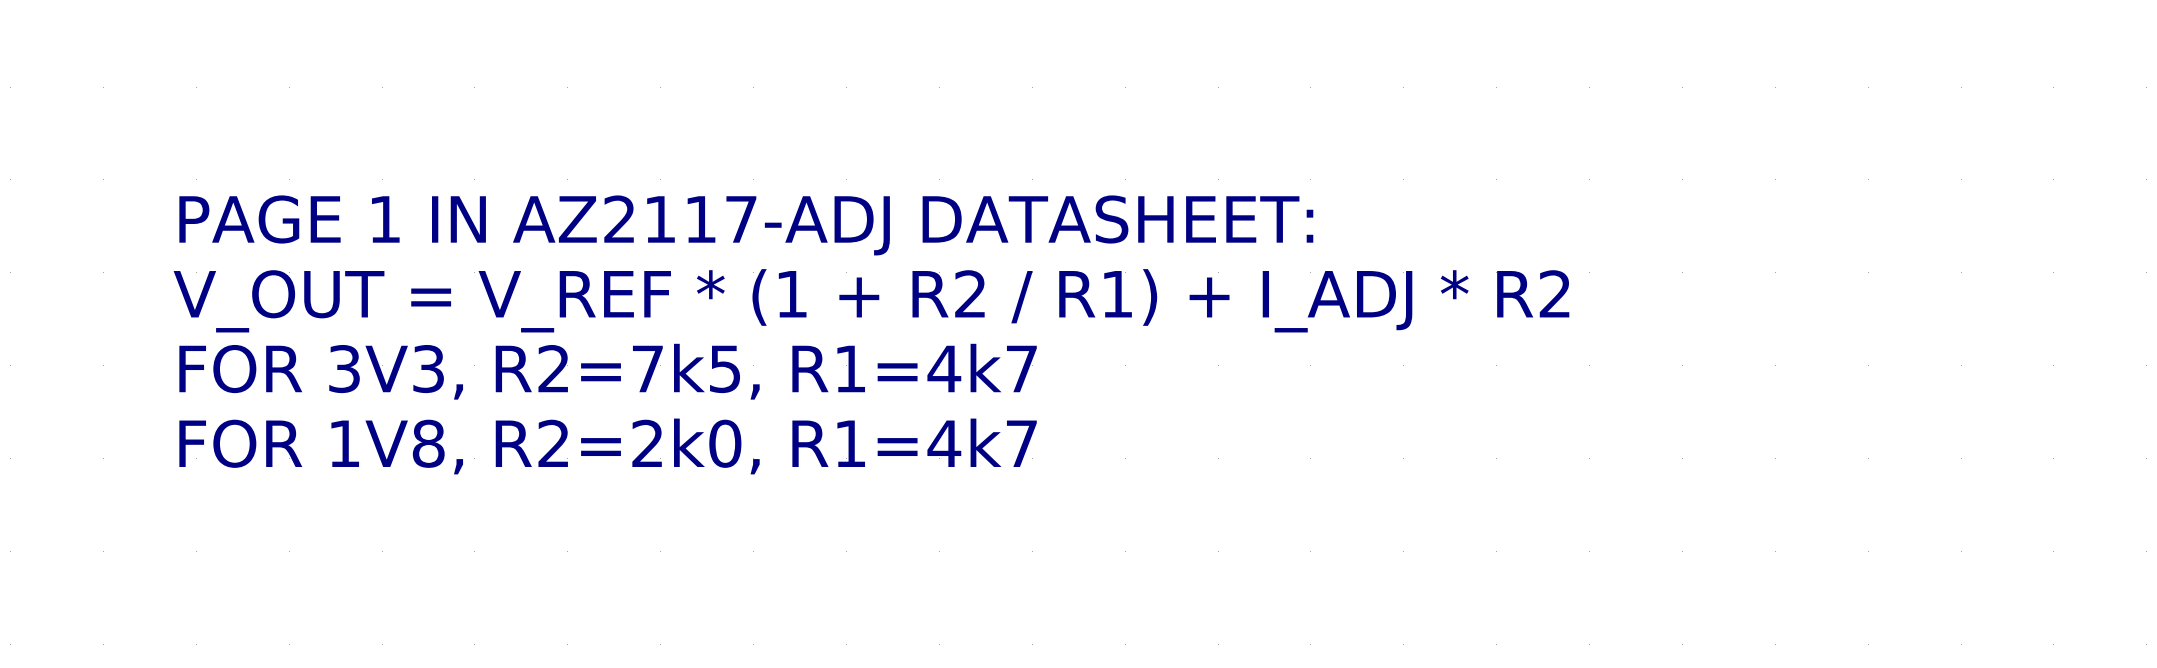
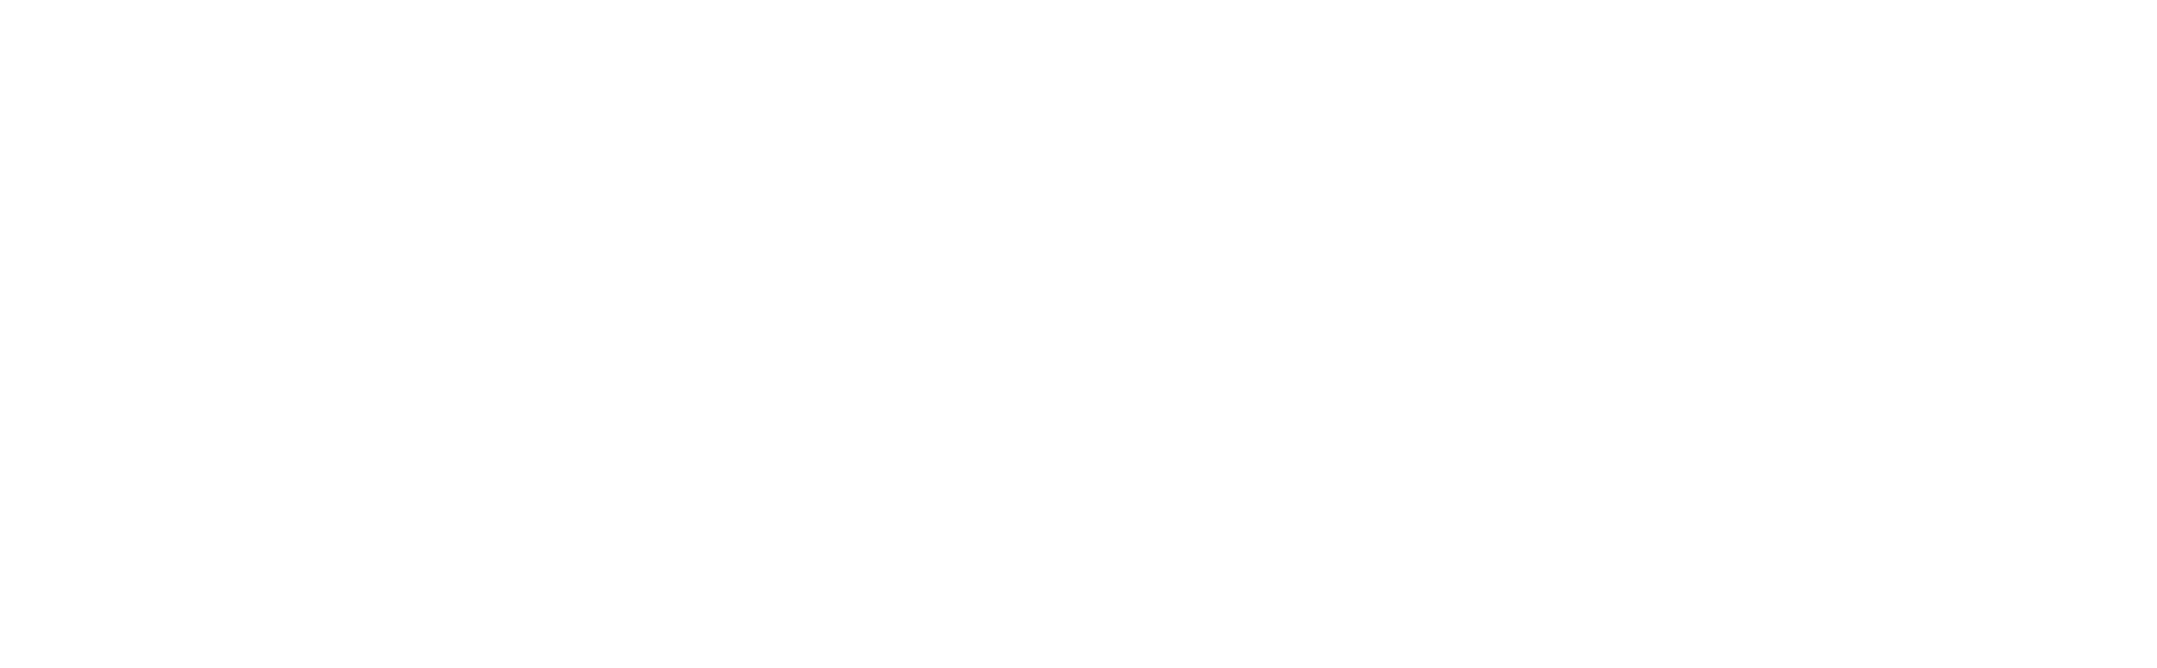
text: PAGE 1 IN AZ2117-ADJ DATASHEET: (746, 225) -> none
text: V_OUT = V_REF * (1 + R2 / R1) + I_ADJ * R2 (871, 300) -> none
text: FOR 3V3, R2=7k5, R1=4k7 (608, 371) -> none
text: FOR 1V8, R2=2k0, R1=4k7 (608, 446) -> none

